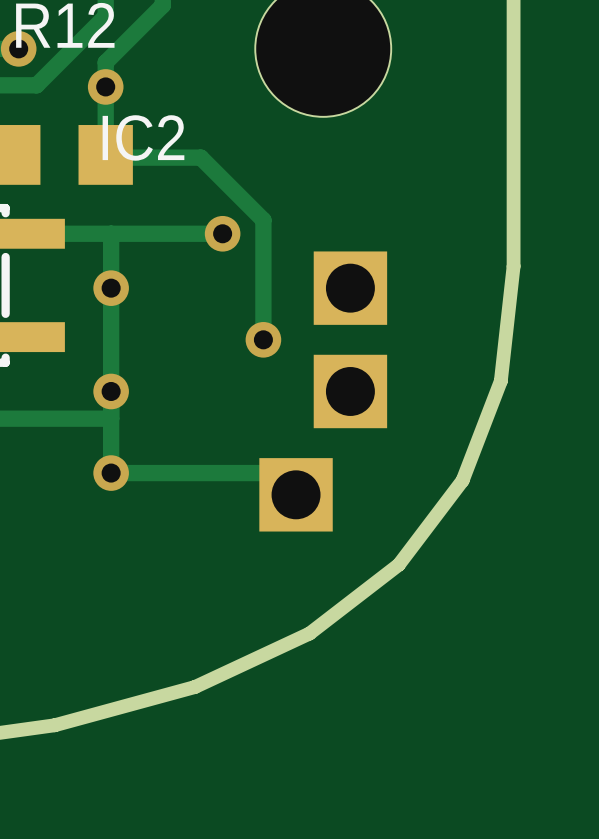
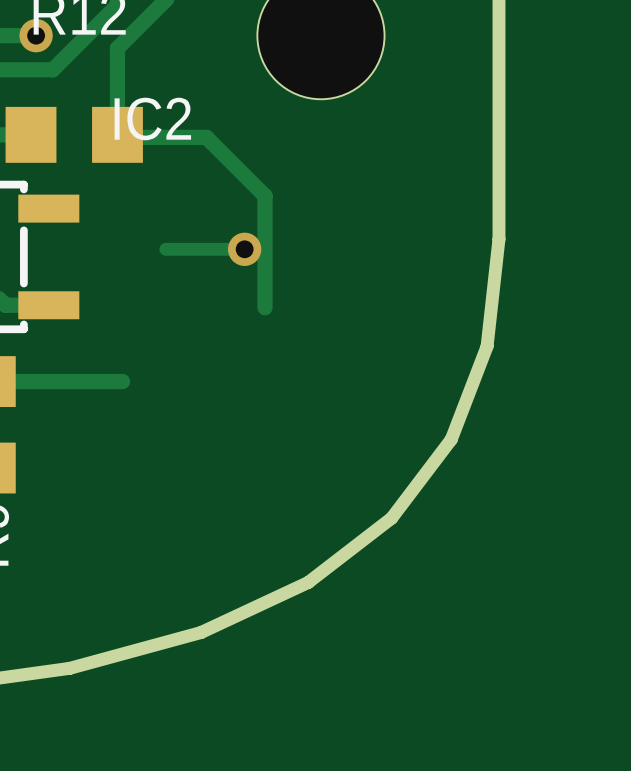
via: (105, 86) -> none
track: (111, 233) (111, 473) (274, 473) (296, 494) -> none
track: (222, 233) (32, 233) -> none
via: (222, 233) -> none
track: none -> (244, 249) (165, 249)
via: none -> (244, 249)
via: (111, 288) -> none
part: (350, 288) -> none
via: (263, 339) -> none
via: (111, 391) -> none
part: (350, 391) -> none
via: (111, 473) -> none
part: (296, 494) -> none

